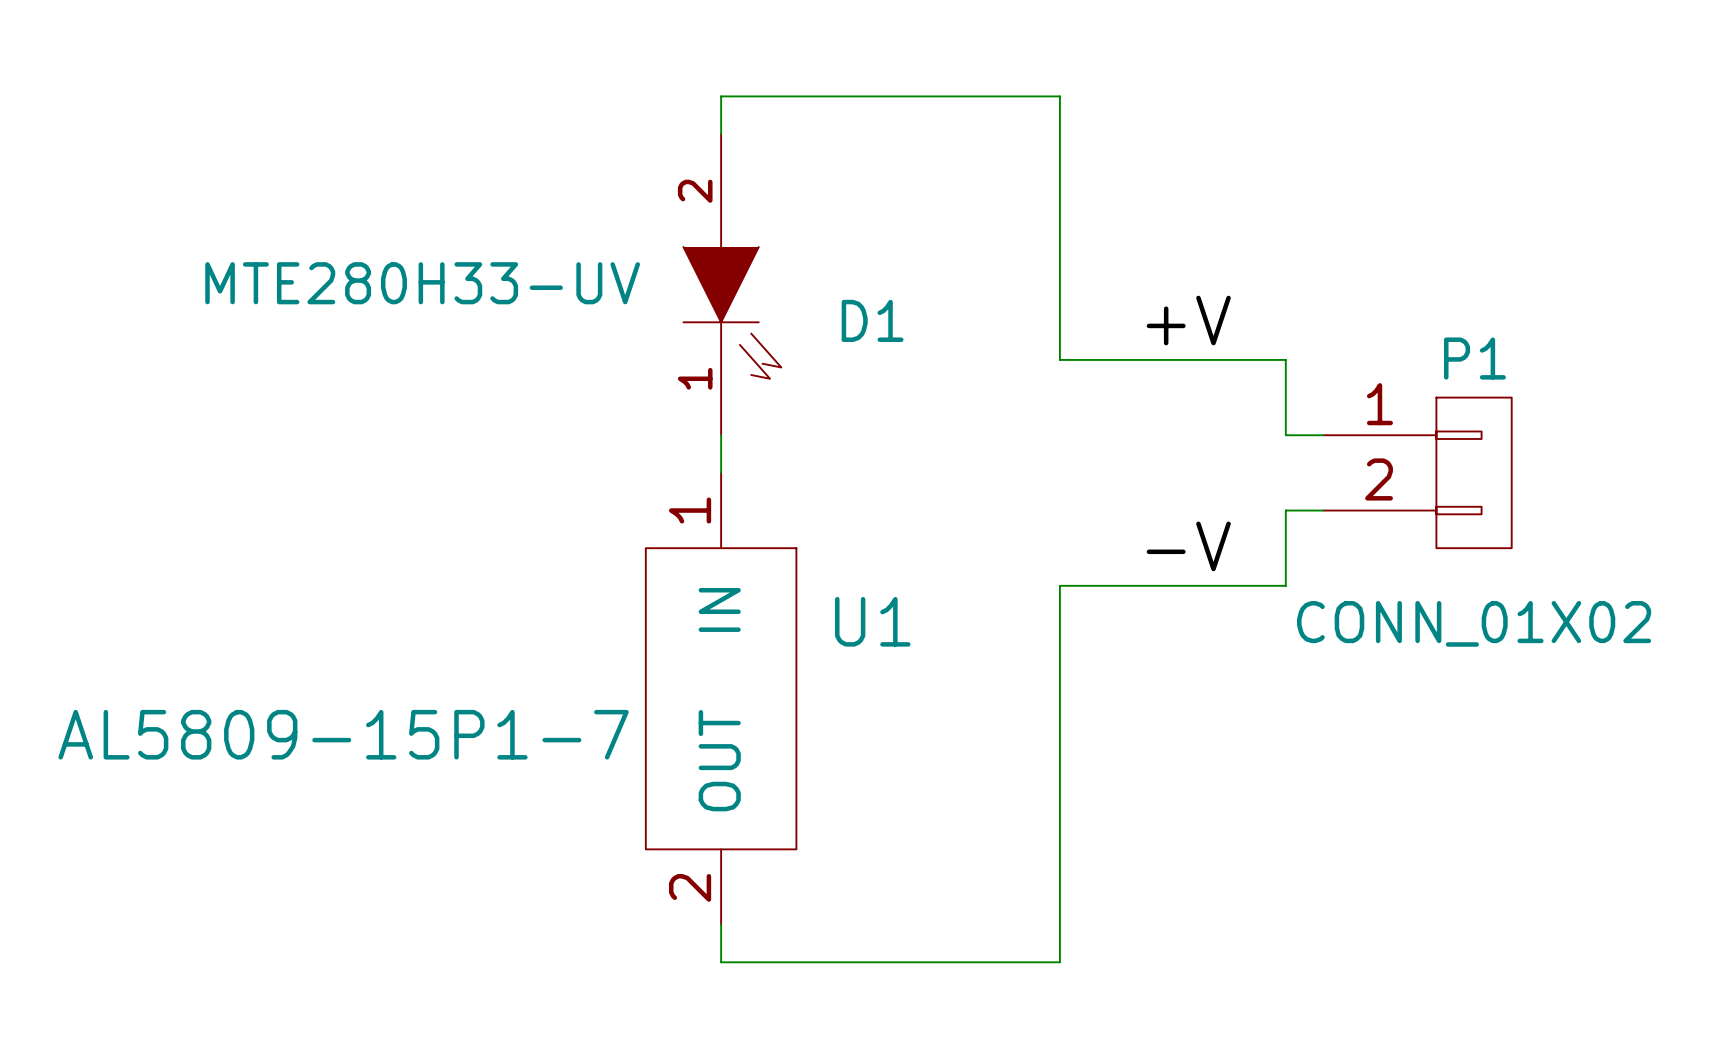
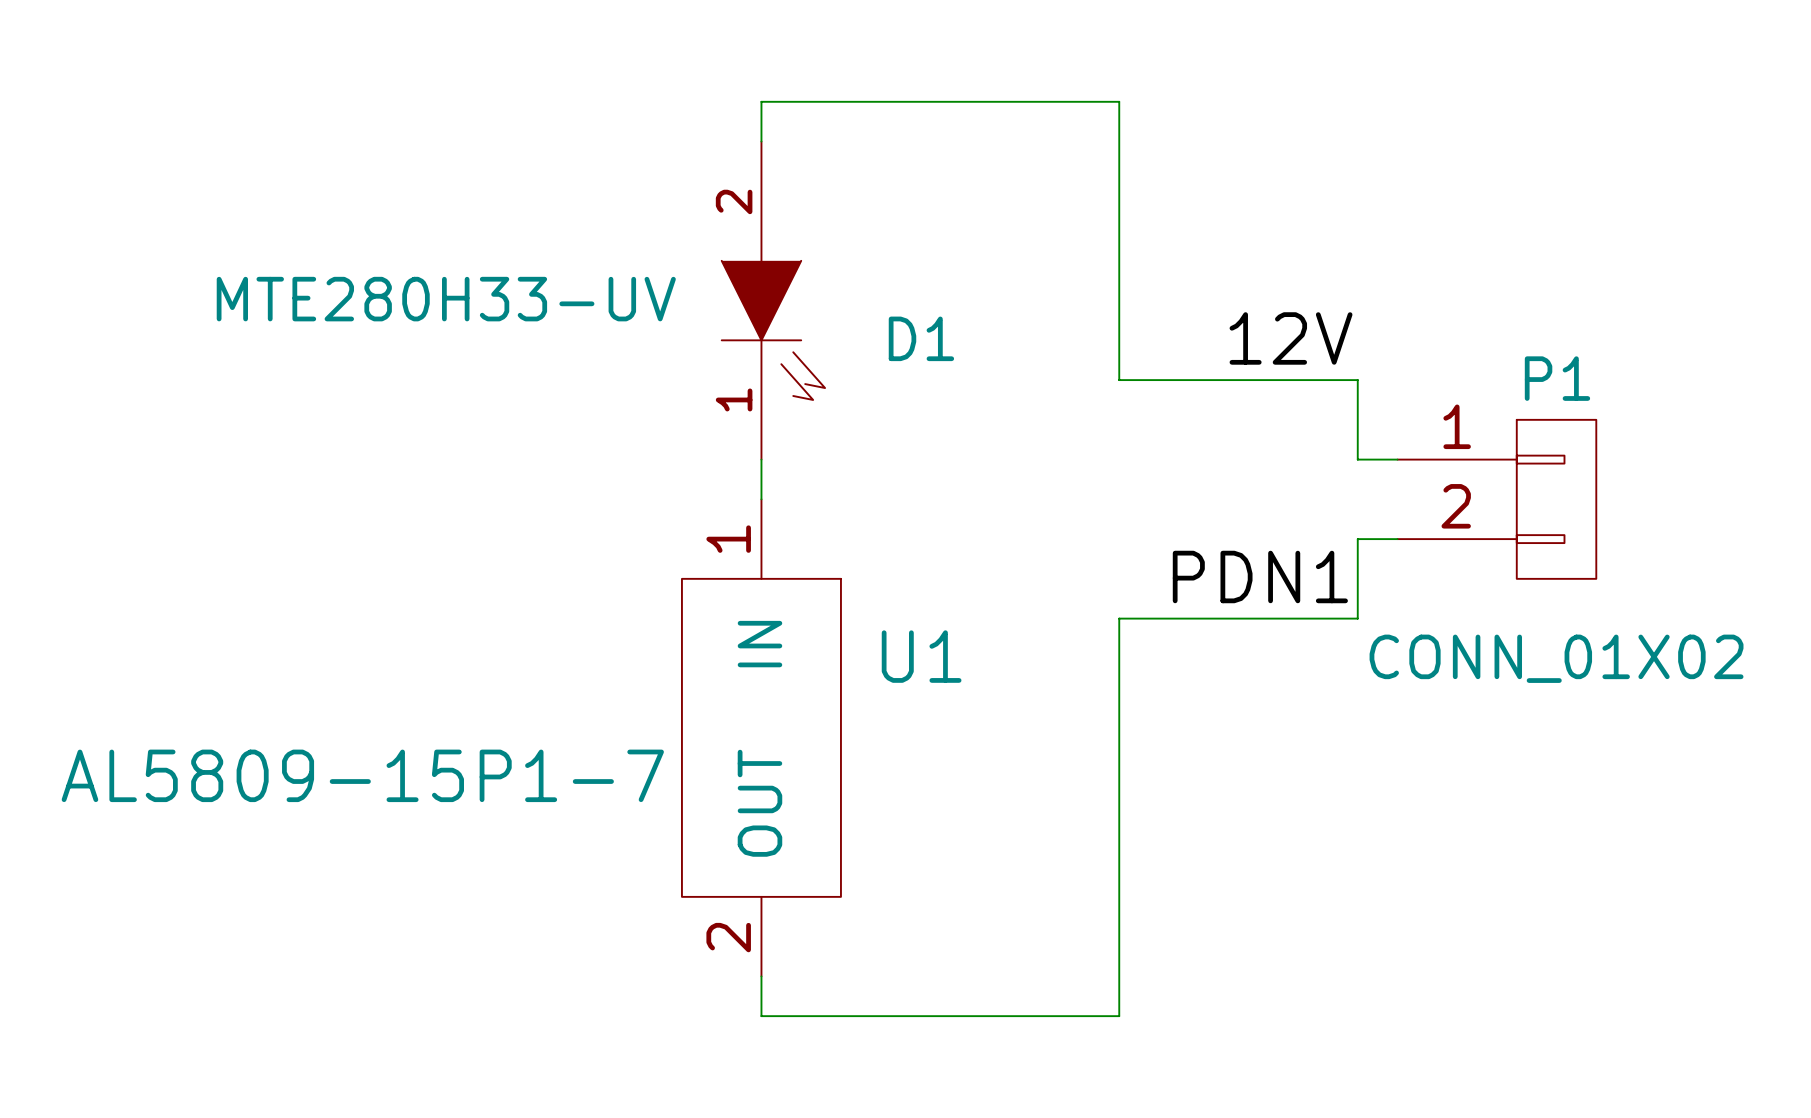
label: +V (1188, 320) -> none
label: none -> 12V (1291, 338)
label: -V (1188, 546) -> none
label: none -> PDN1 (1260, 576)

